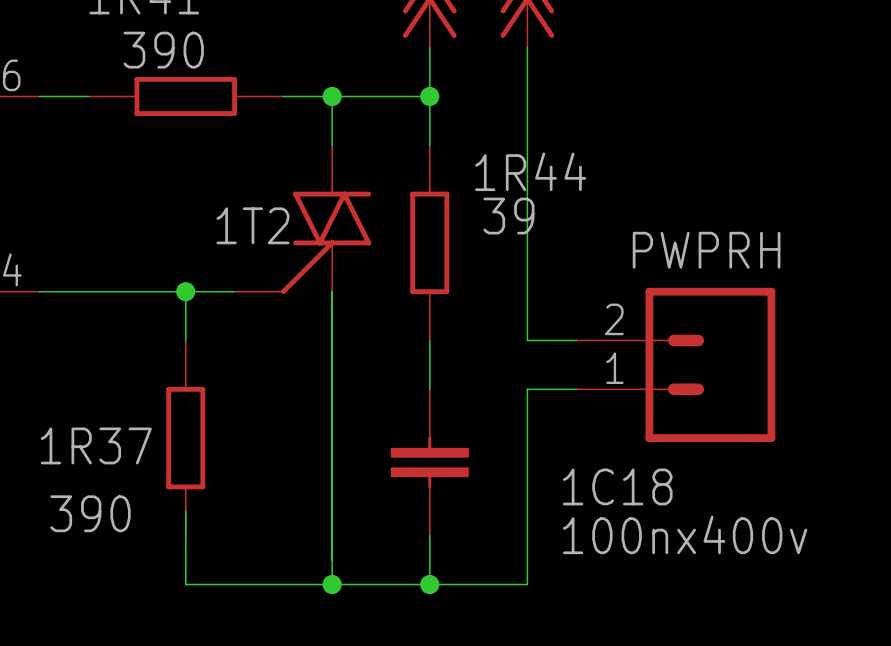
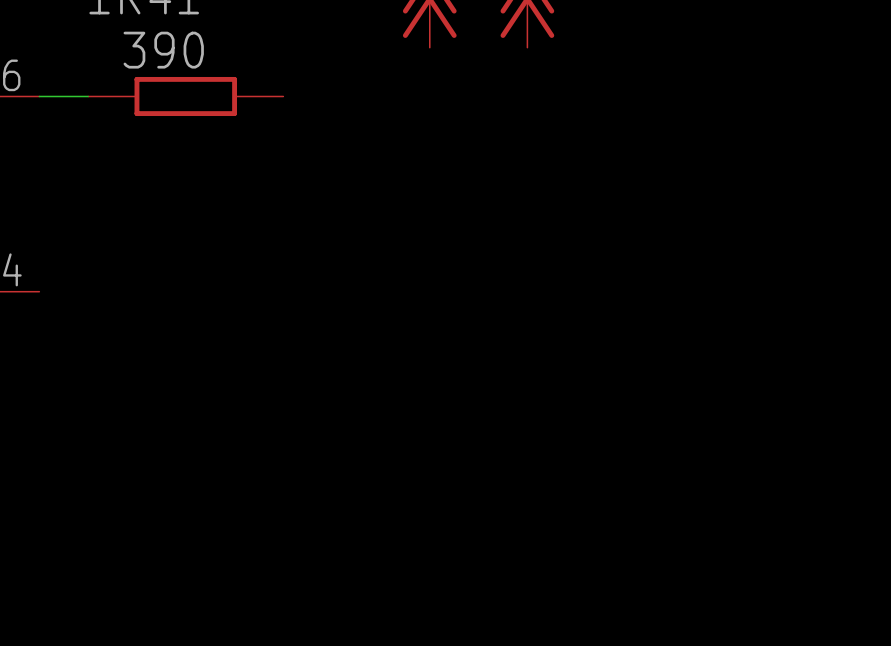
wire: (429, 47) (429, 145) -> none
wire: (527, 47) (527, 340) (576, 340) -> none
wire: (283, 96) (429, 96) -> none
wire: (332, 96) (332, 145) -> none
junction: (332, 96) -> none
junction: (429, 96) -> none
1T2: (302, 219) -> none
1R44: 39 (429, 242) -> none
wire: (39, 291) (234, 291) -> none
wire: (185, 291) (185, 340) -> none
junction: (185, 291) -> none
wire: (332, 291) (332, 584) -> none
wire: (429, 340) (429, 389) -> none
PWPRH: (675, 364) -> none
wire: (576, 389) (527, 389) (527, 584) (185, 584) (185, 511) -> none
1R37: 390 (185, 438) -> none
1C18: 100nx400v (429, 462) -> none
wire: (429, 535) (429, 584) -> none
junction: (332, 584) -> none
junction: (429, 584) -> none

